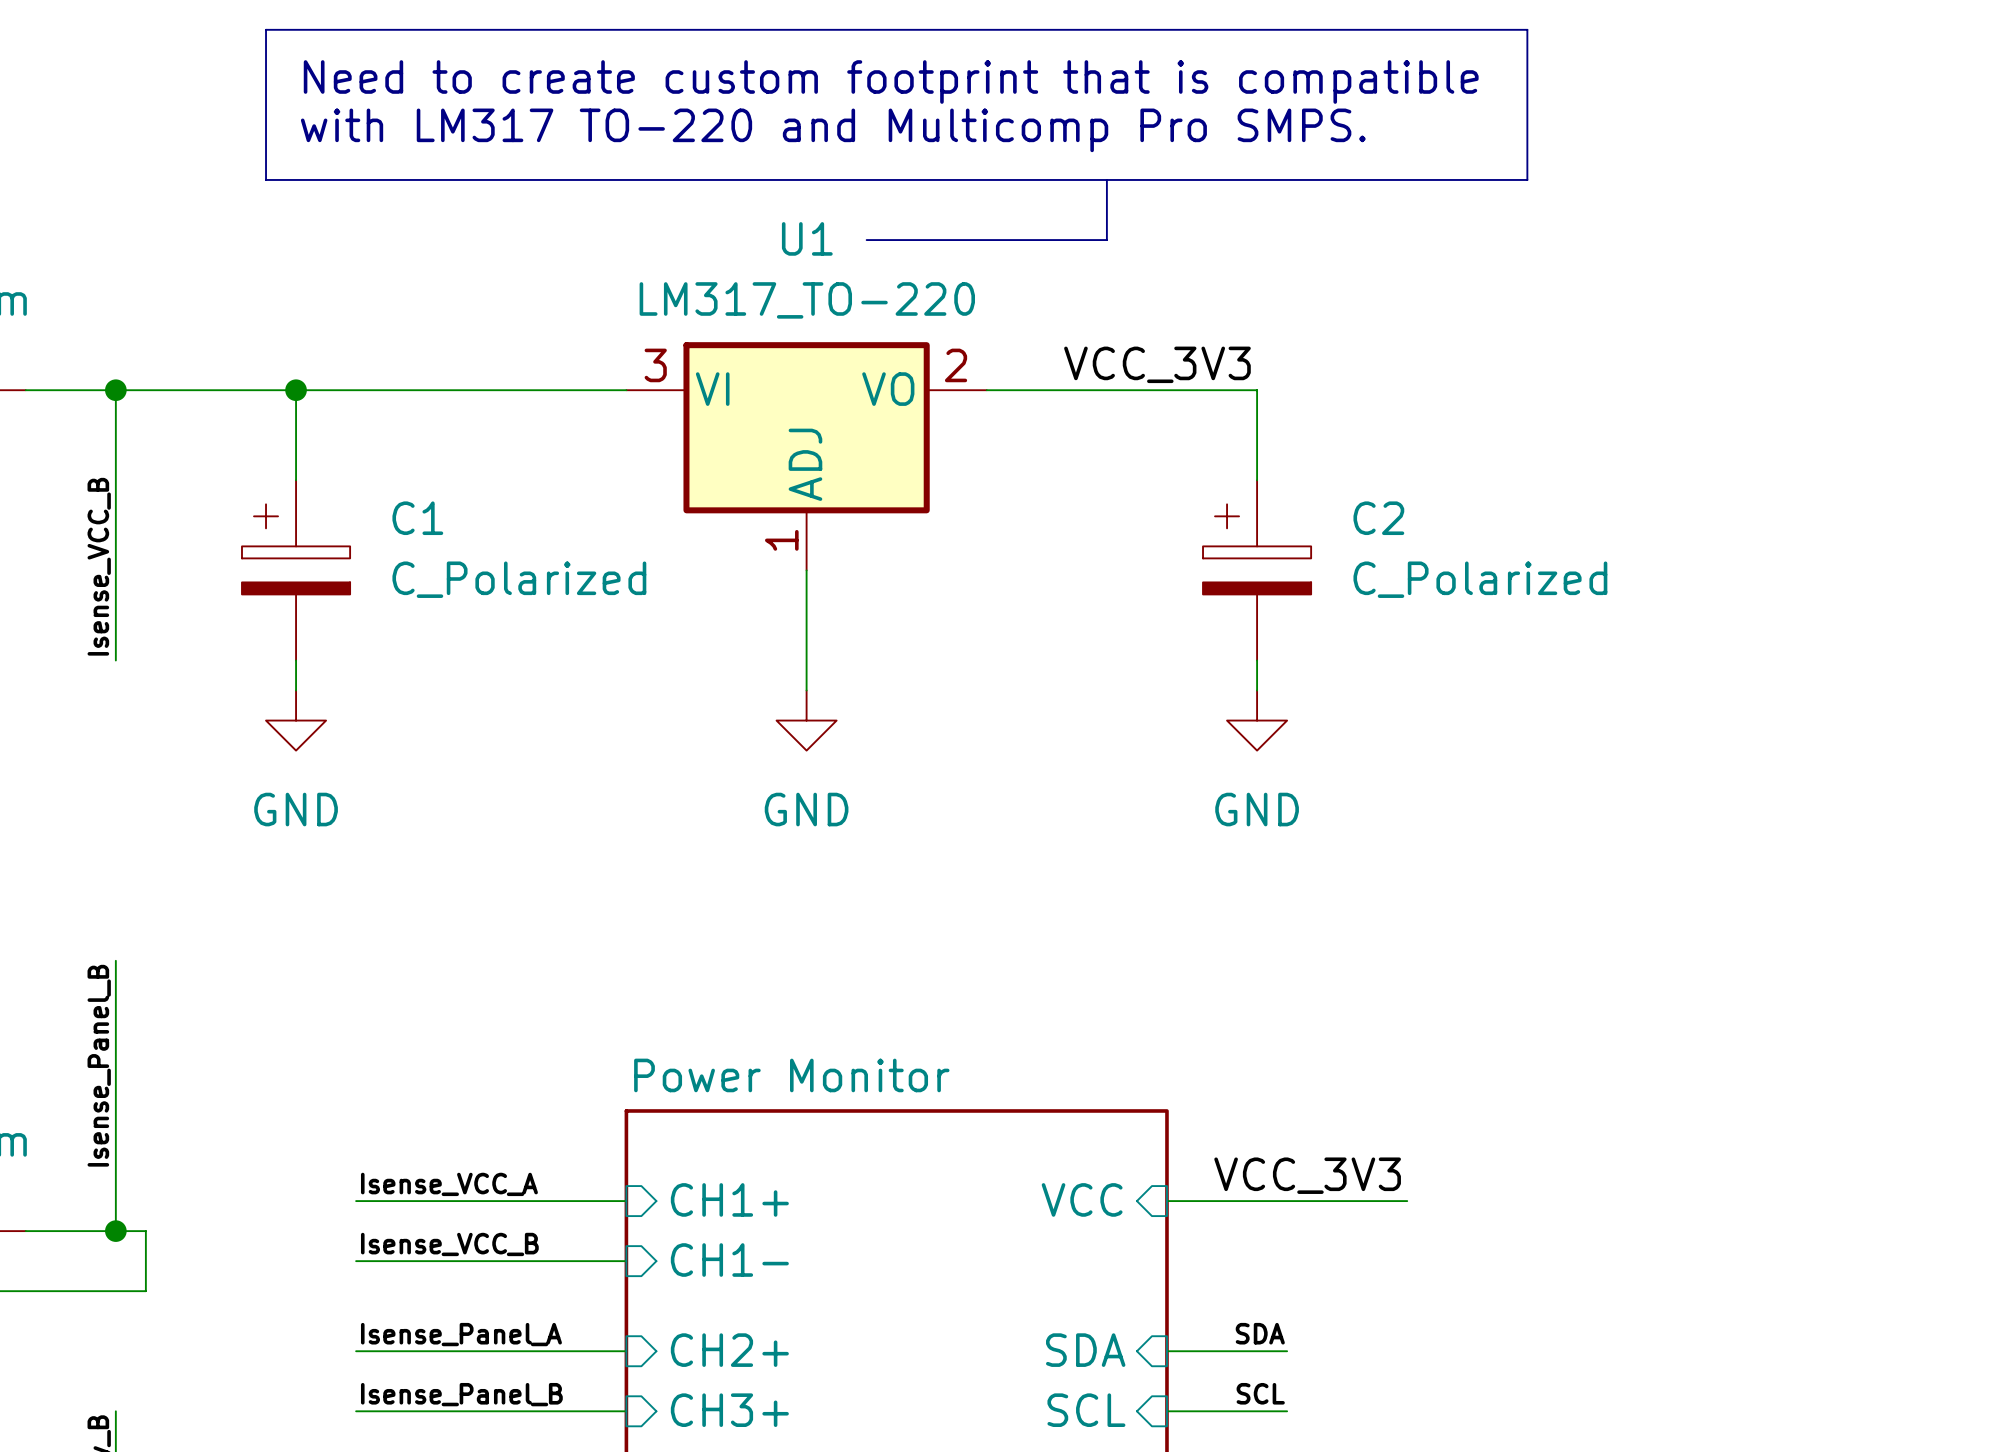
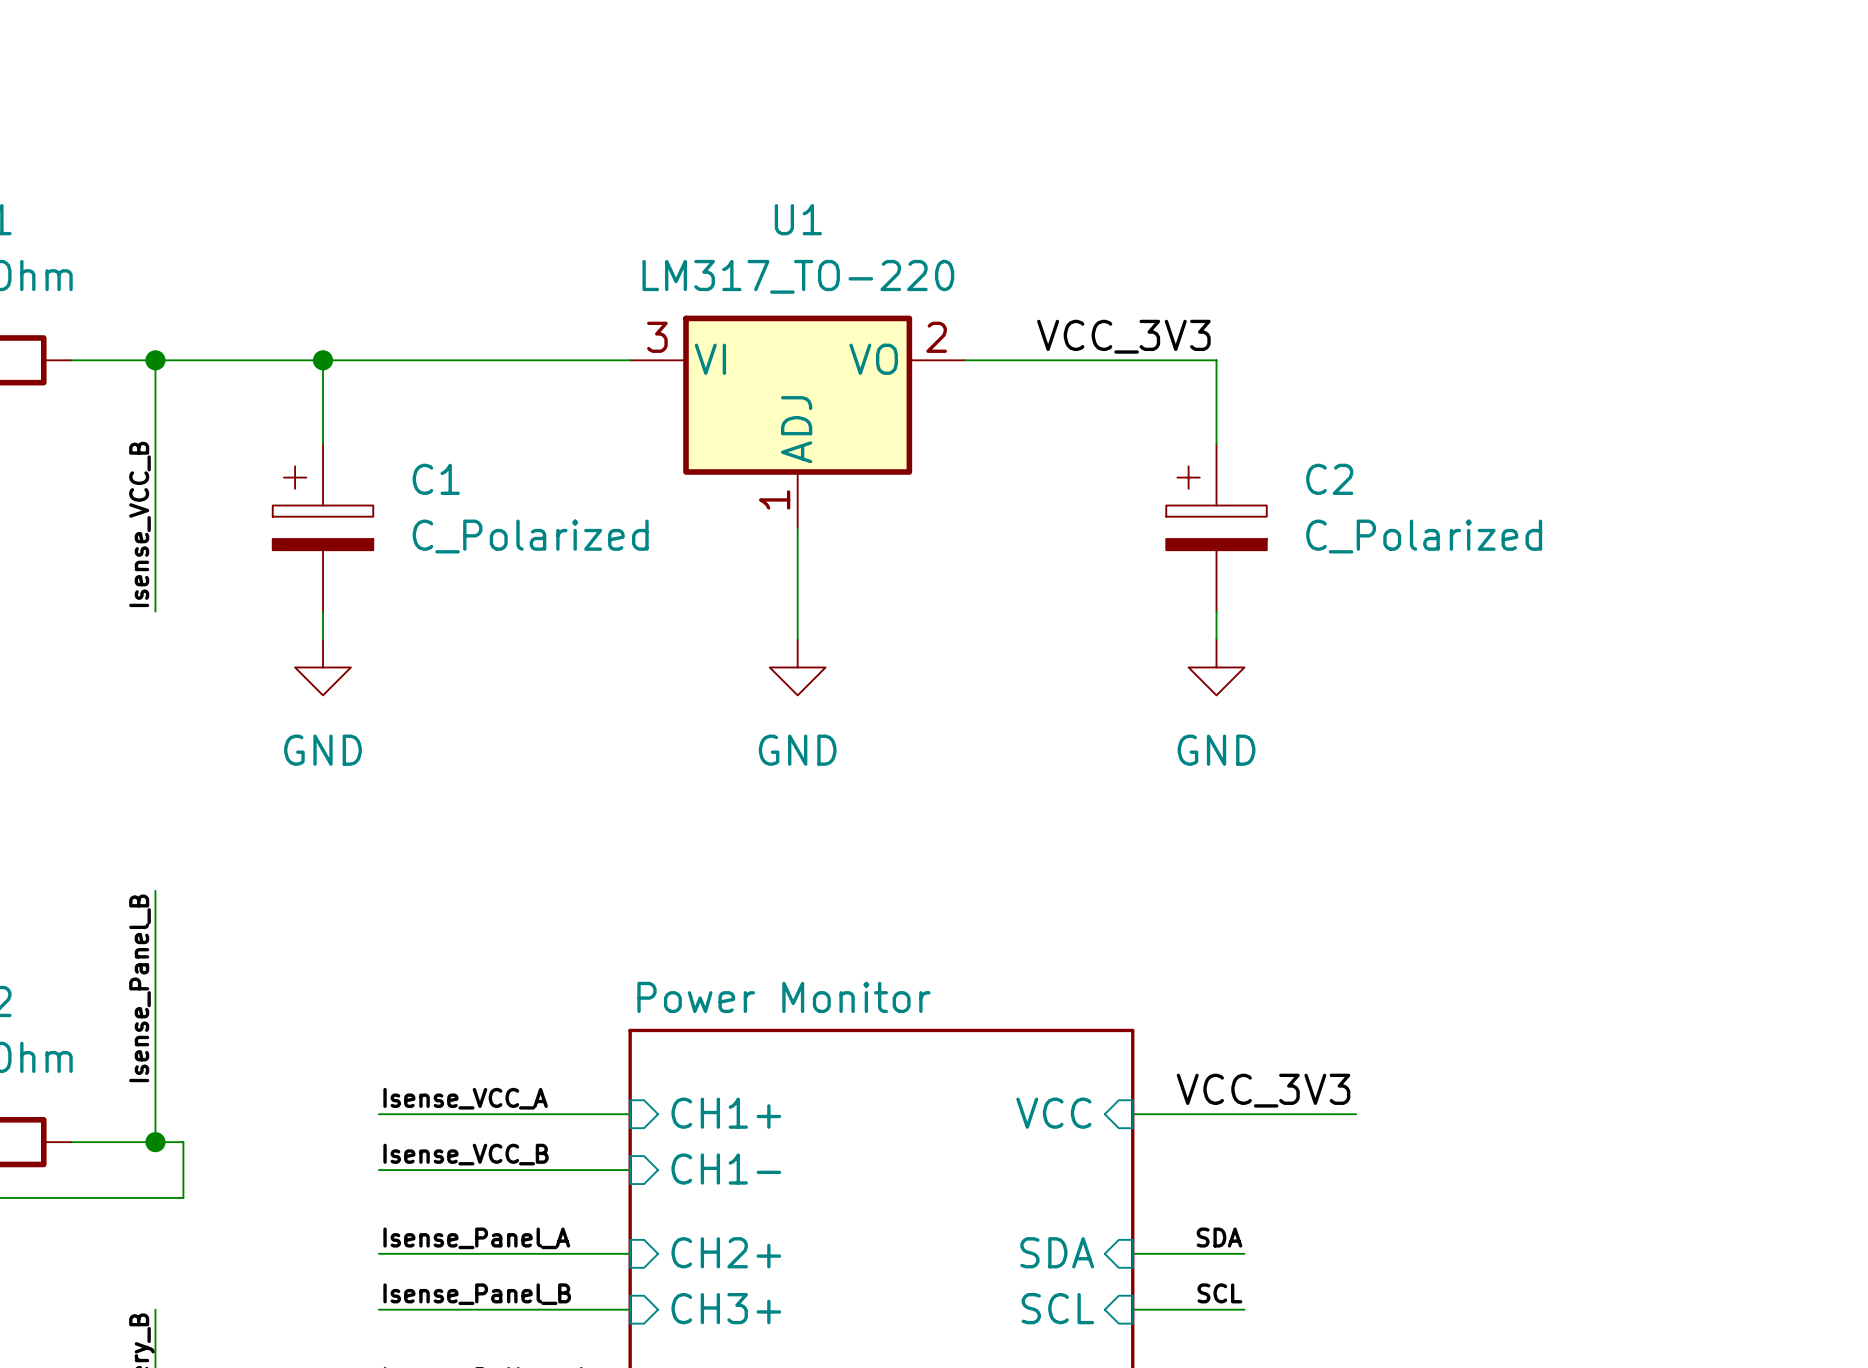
line: (266, 29) (1527, 29) (1527, 179) (266, 179) (266, 29) -> none
text: Need to create custom footprint that is compatible (891, 82) -> none
text: with LM317 TO-220 and Multicomp Pro SMPS. (833, 130) -> none
line: (1106, 179) (1106, 240) (866, 240) -> none

